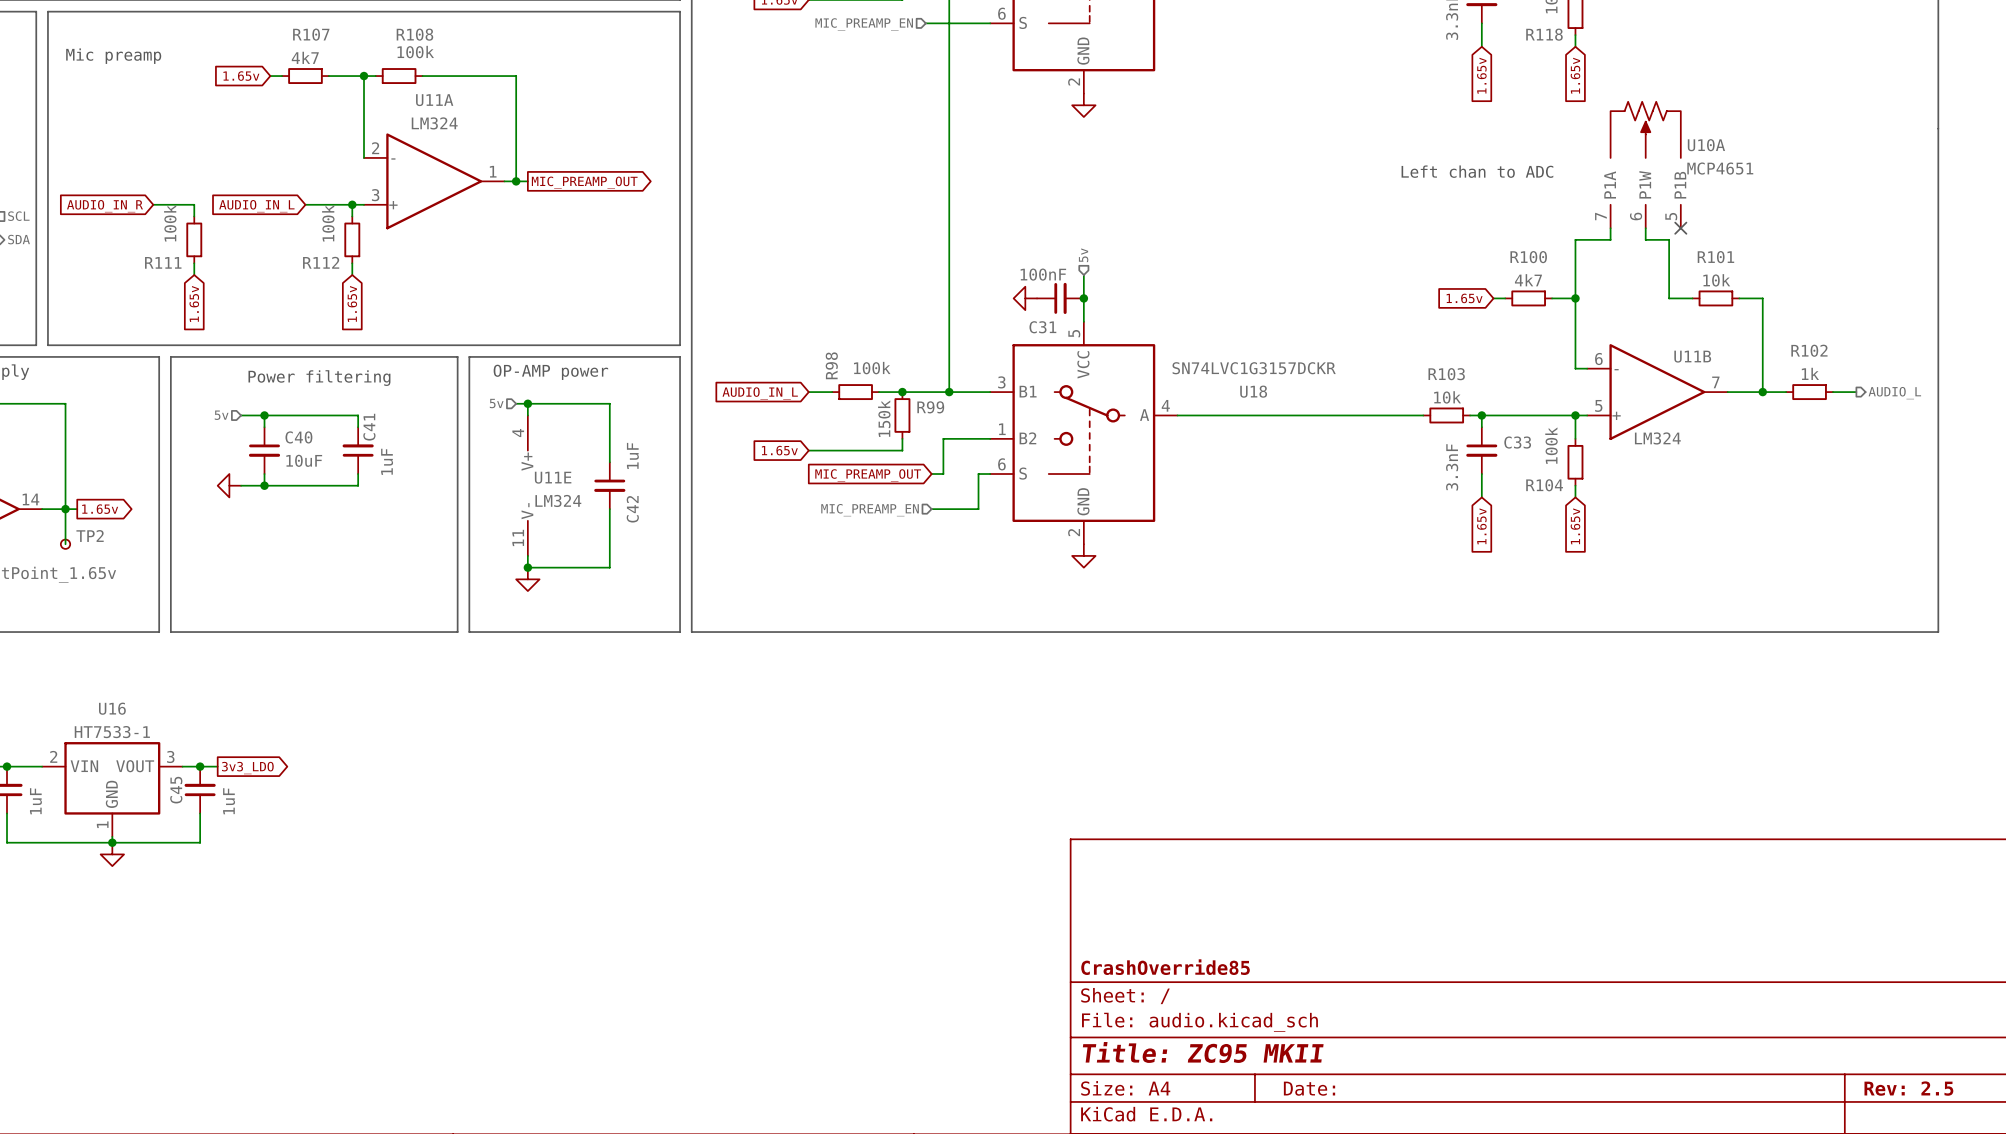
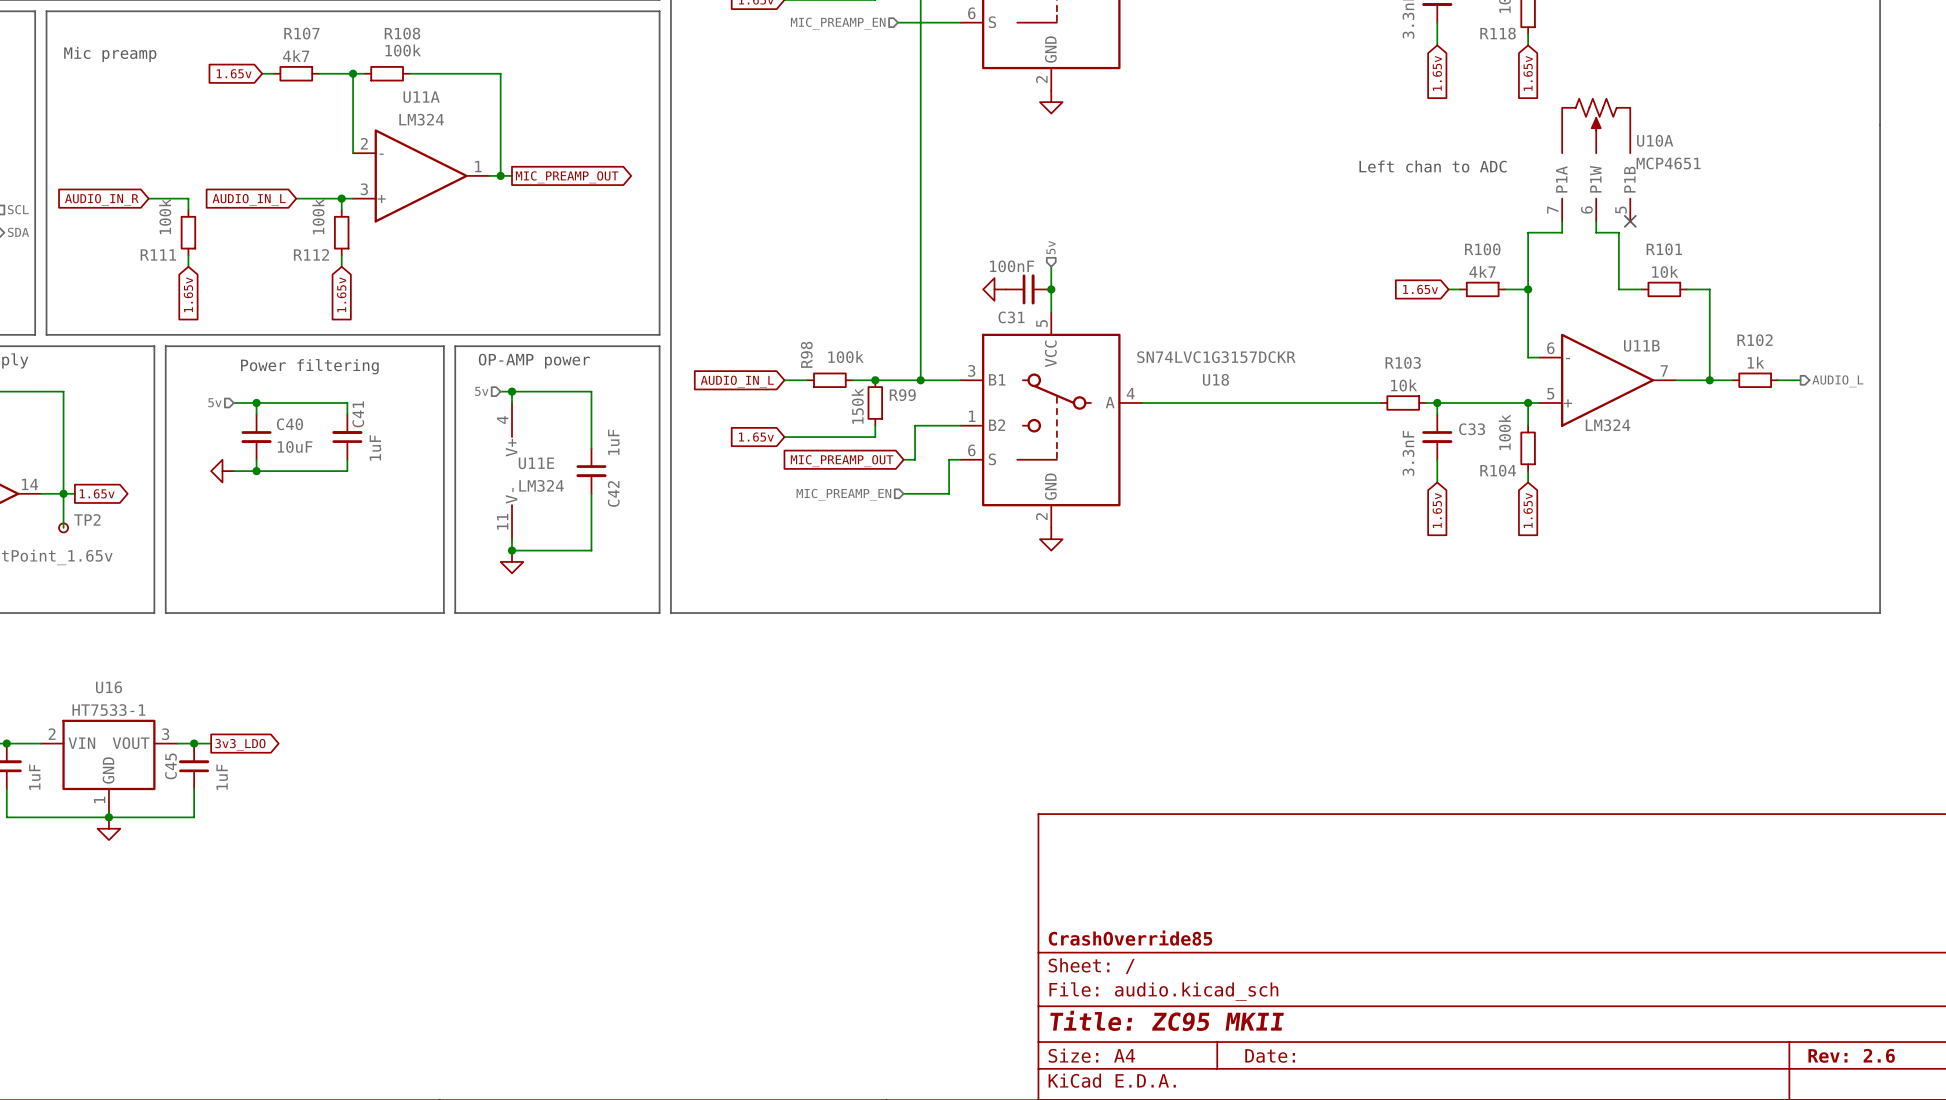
title block: Rev: 2.5 (1908, 1088) -> Rev: 2.6 (1851, 1055)

